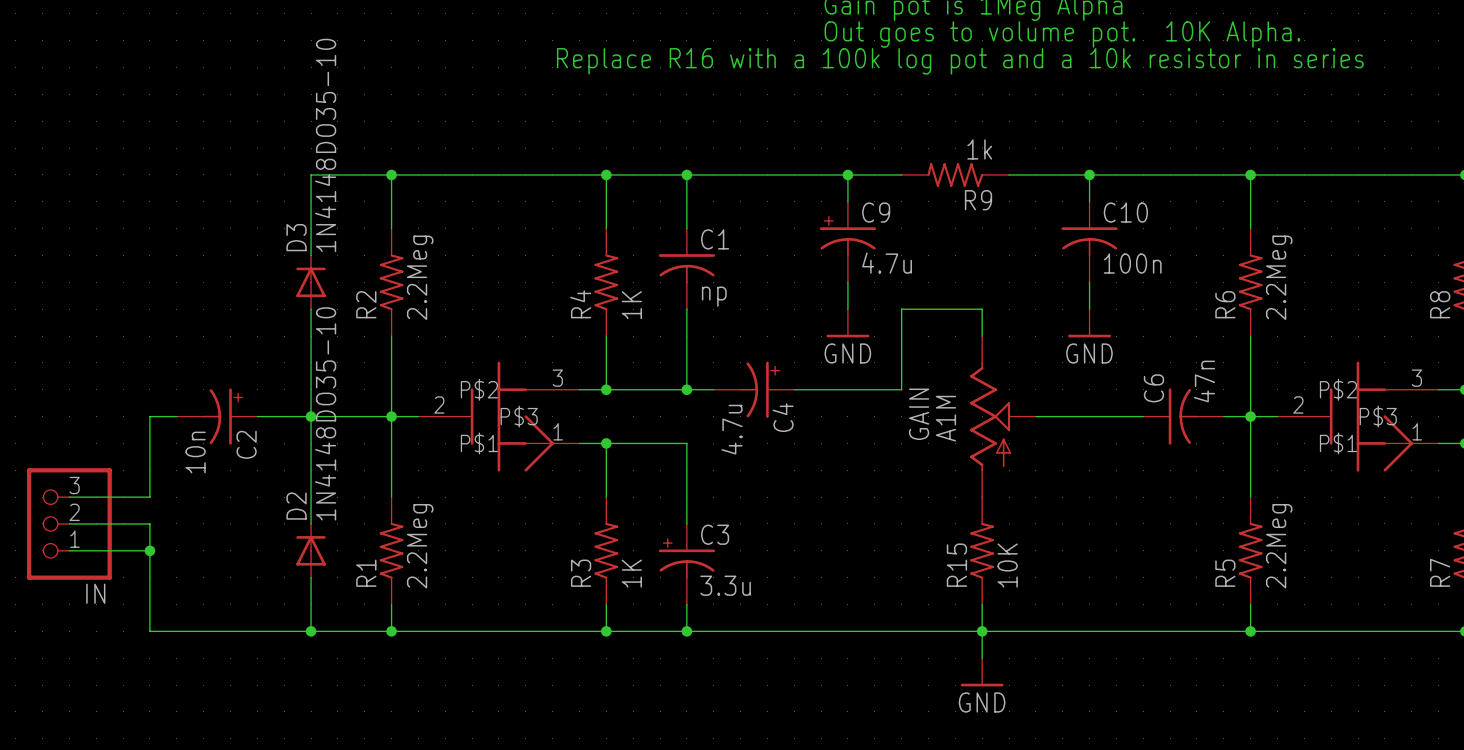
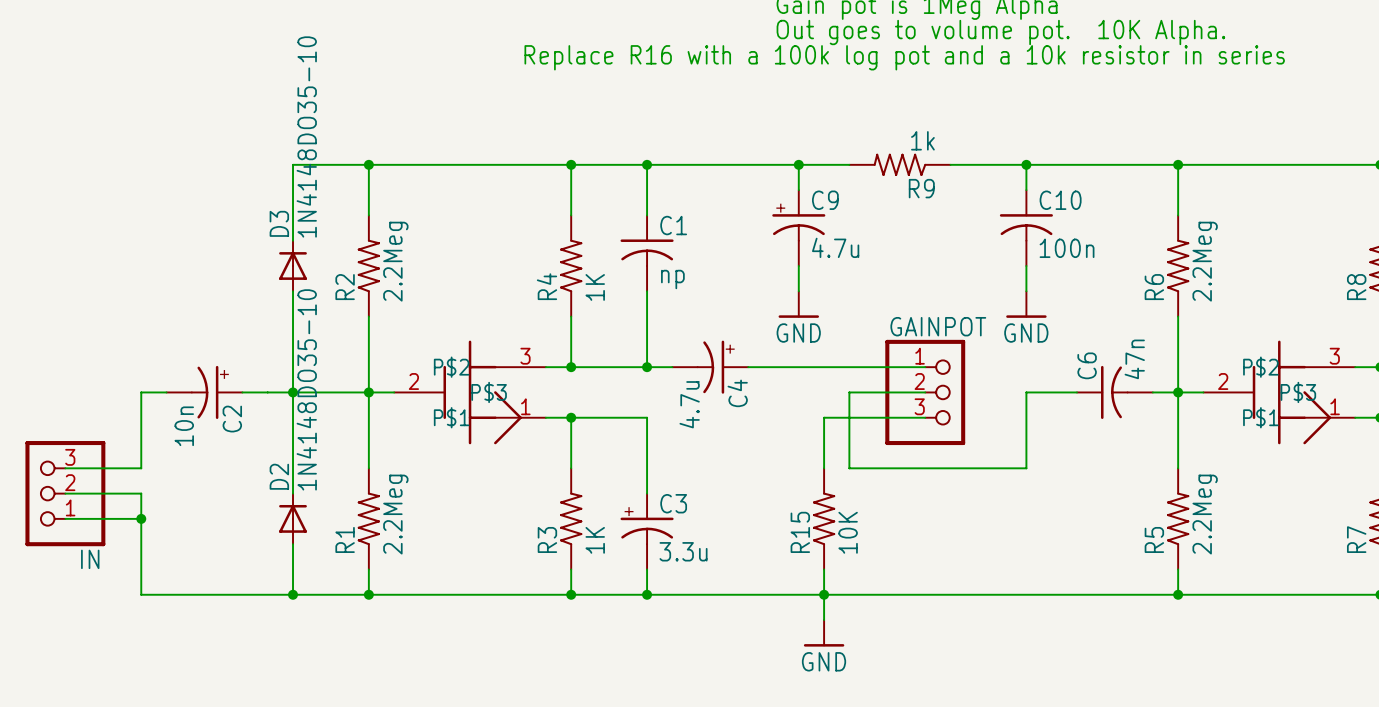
wire: (982, 336) (982, 309) (901, 309) (901, 389) -> (925, 367) (849, 367)
GAINPOT: none -> (925, 392)
GAIN: A1M (1002, 416) -> none
wire: (1035, 416) (1089, 416) -> (925, 392) (849, 392) (849, 468) (1026, 468) (1026, 392)
wire: none -> (925, 417) (824, 417) (824, 468)
R15 position: (982, 550) -> (824, 518)
wire: (982, 604) (982, 658) -> (824, 569) (824, 620)
junction: none -> (824, 594)
junction: (982, 631) -> none
power symbol position: GND (982, 672) -> GND (824, 633)

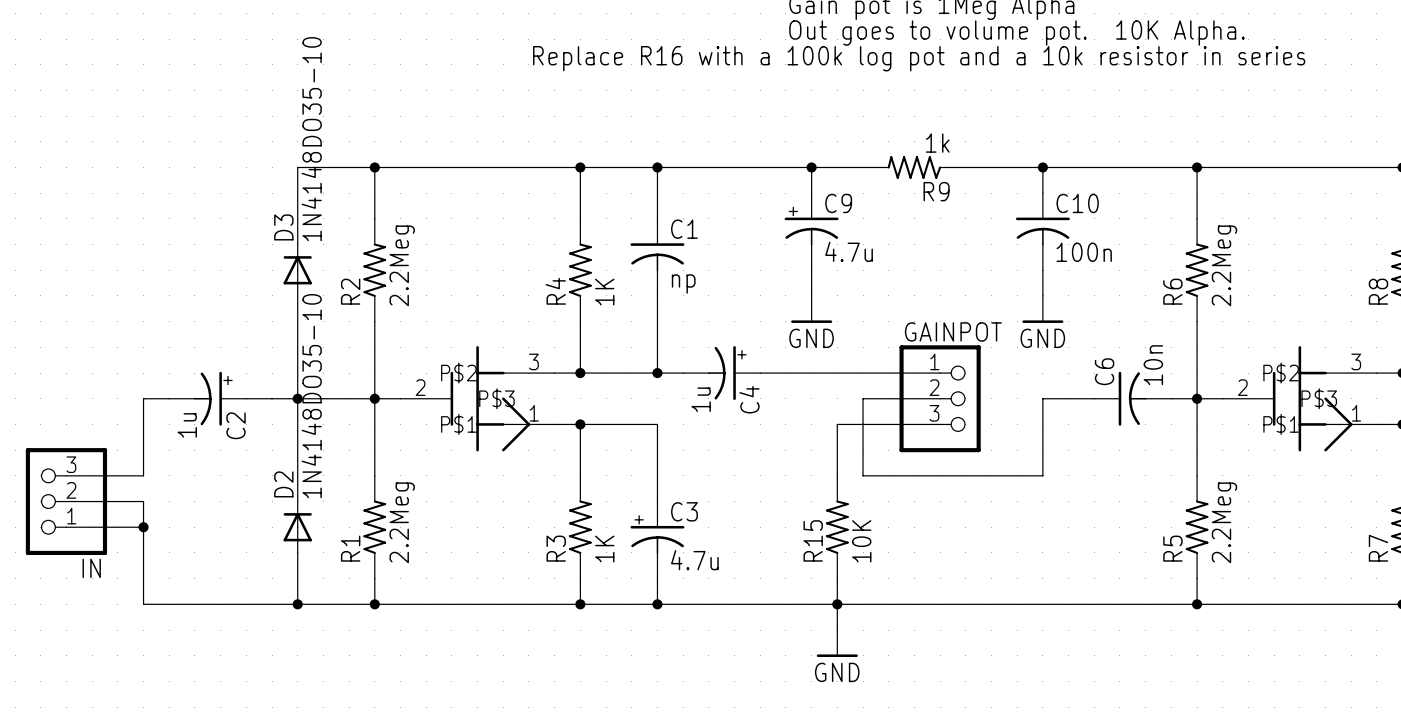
C6 value: 47n (1134, 359) -> 10n (1153, 365)
C4 value: 4.7u (689, 404) -> 1u (701, 399)
C2 value: 10n (184, 426) -> 1u (187, 425)
C3 value: 3.3u (683, 551) -> 4.7u (694, 560)

